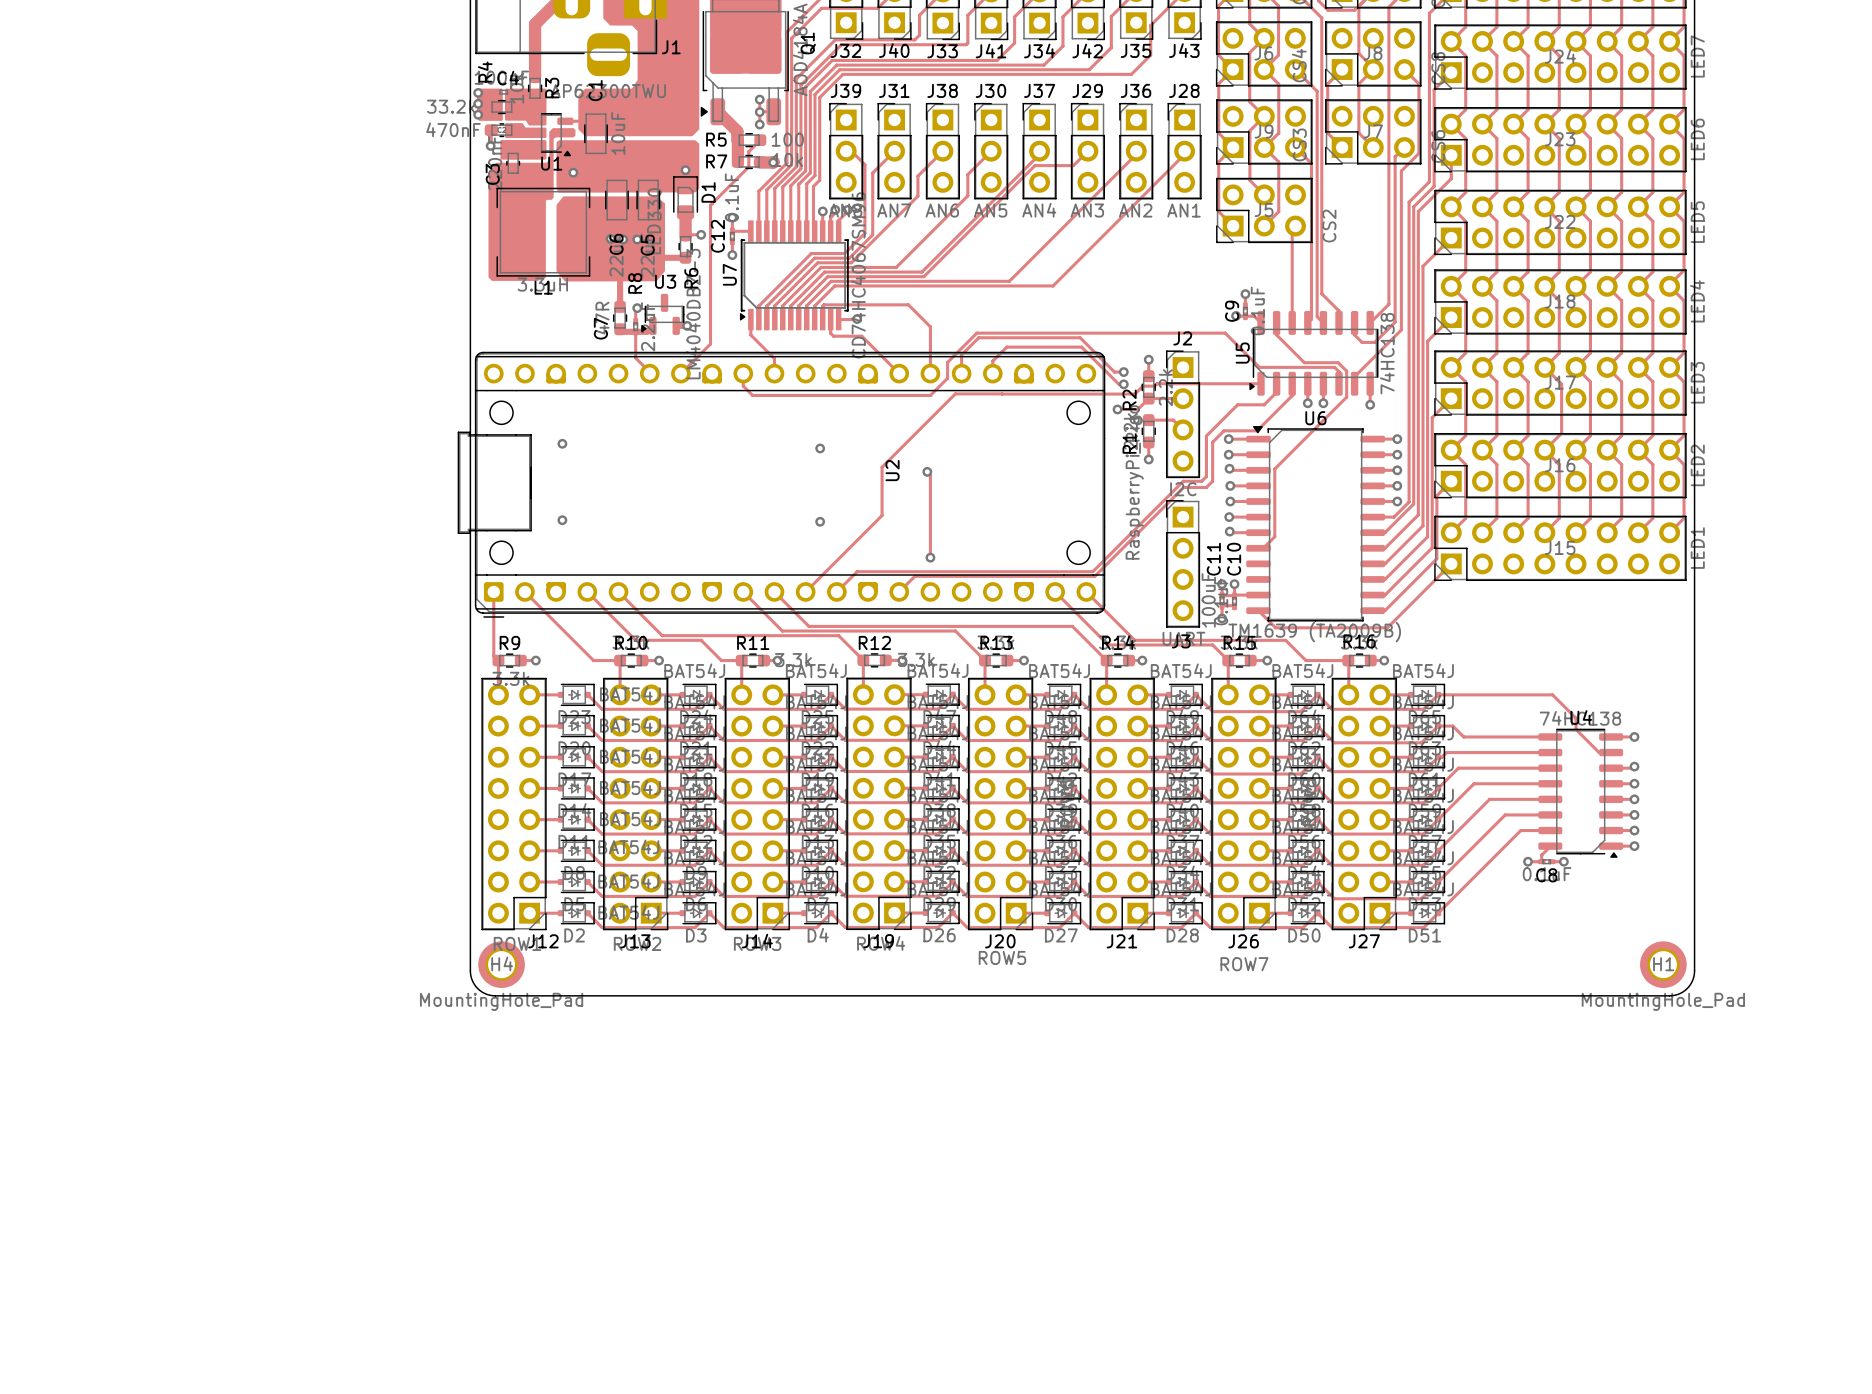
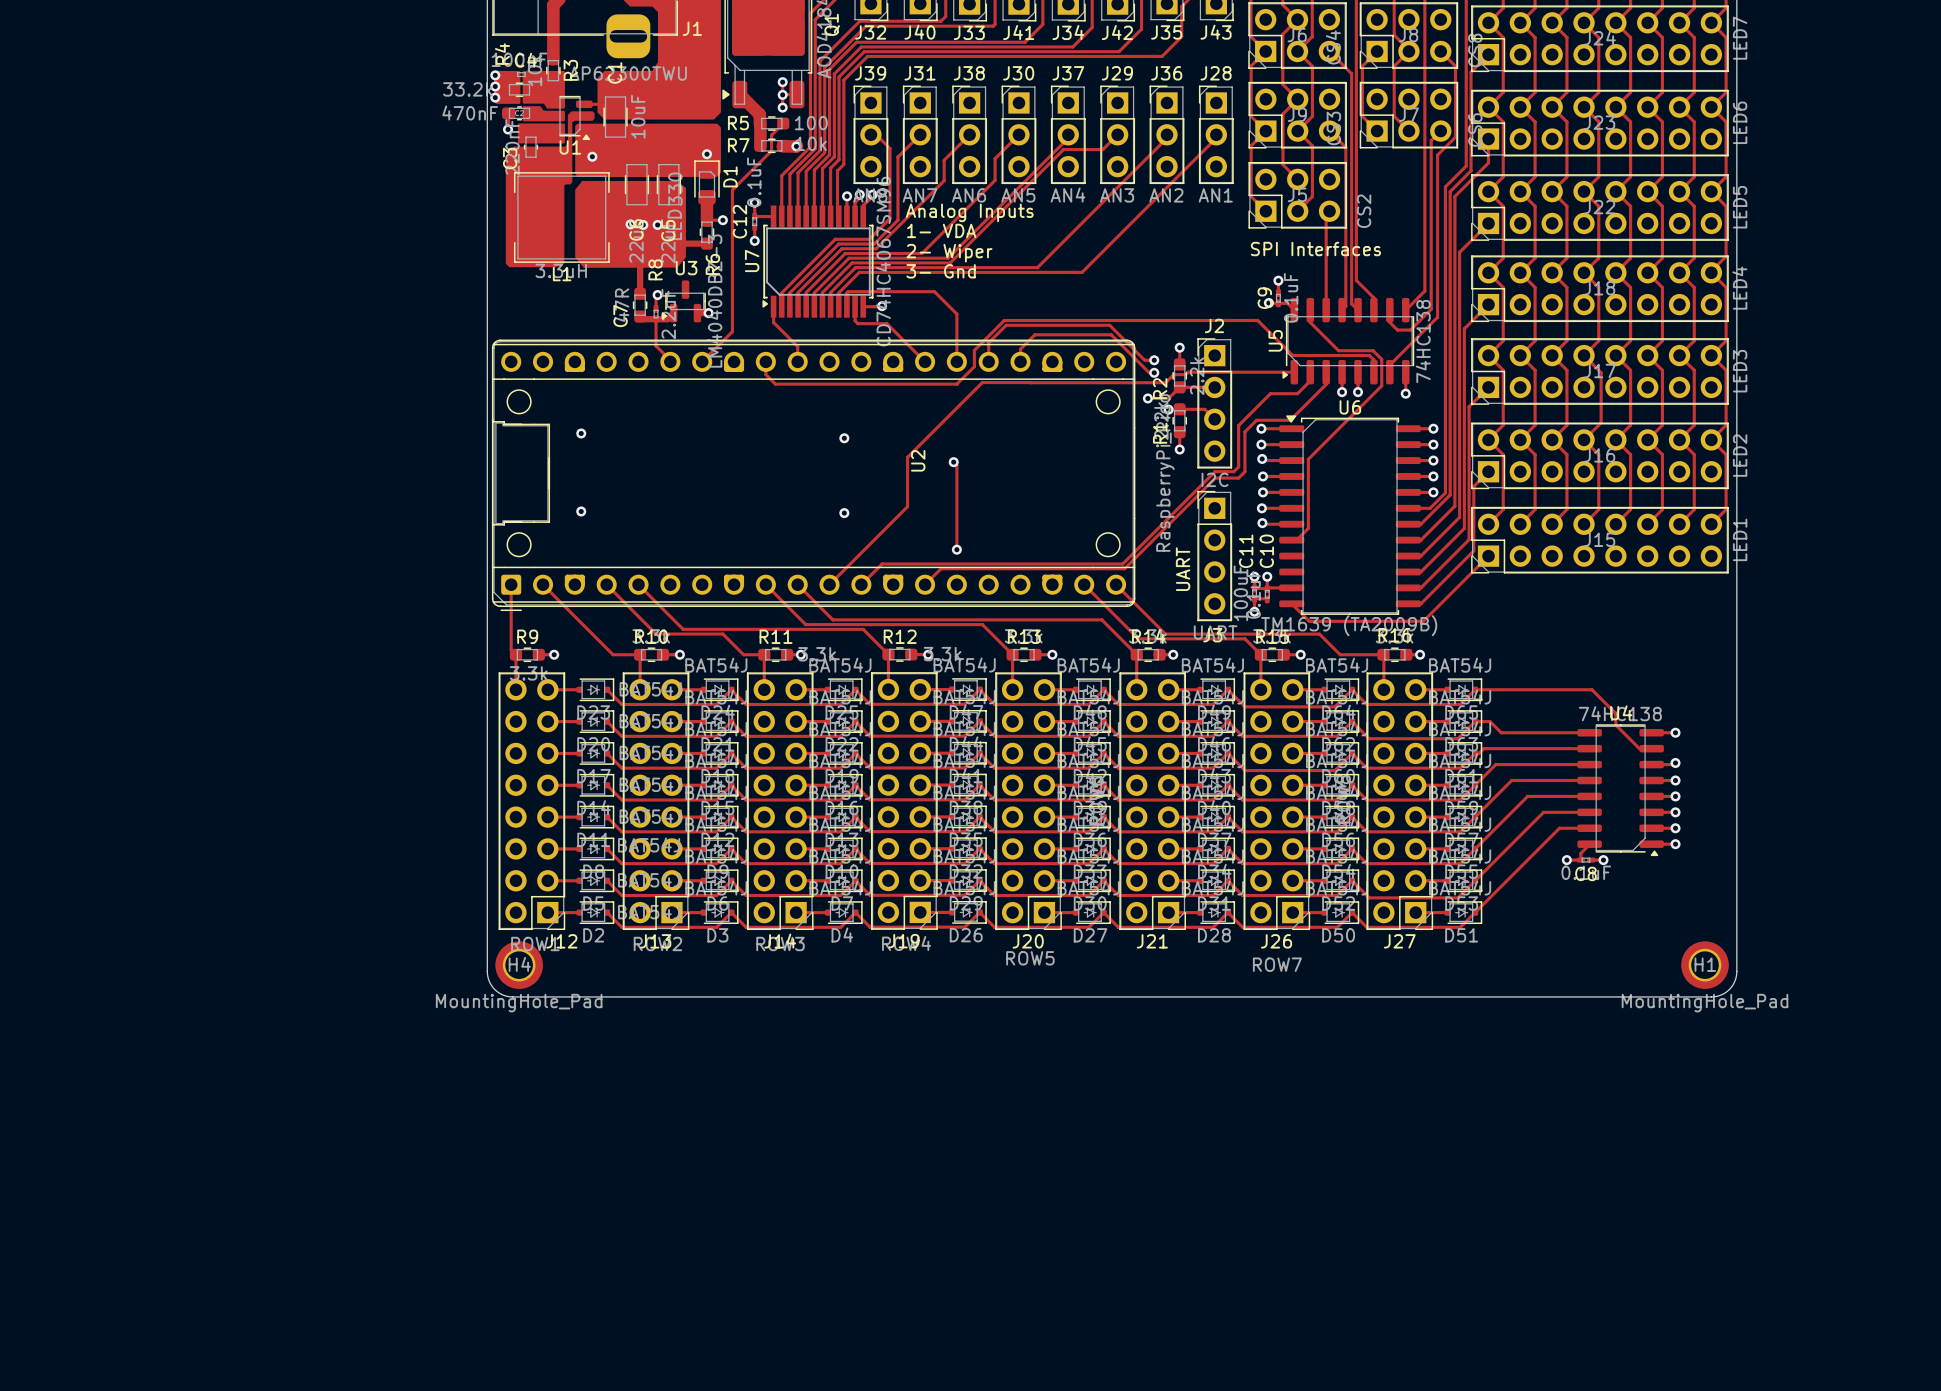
text: none -> Analog Inputs (969, 212)
text: none -> 1- VDA (941, 230)
text: none -> SPI Interfaces (1315, 249)
text: none -> 2- Wiper (949, 253)
text: none -> 3- Gnd (941, 271)
U2 footprint: [457, 351, 1106, 618] -> [491, 339, 1136, 612]
text: none -> UART (1183, 569)

